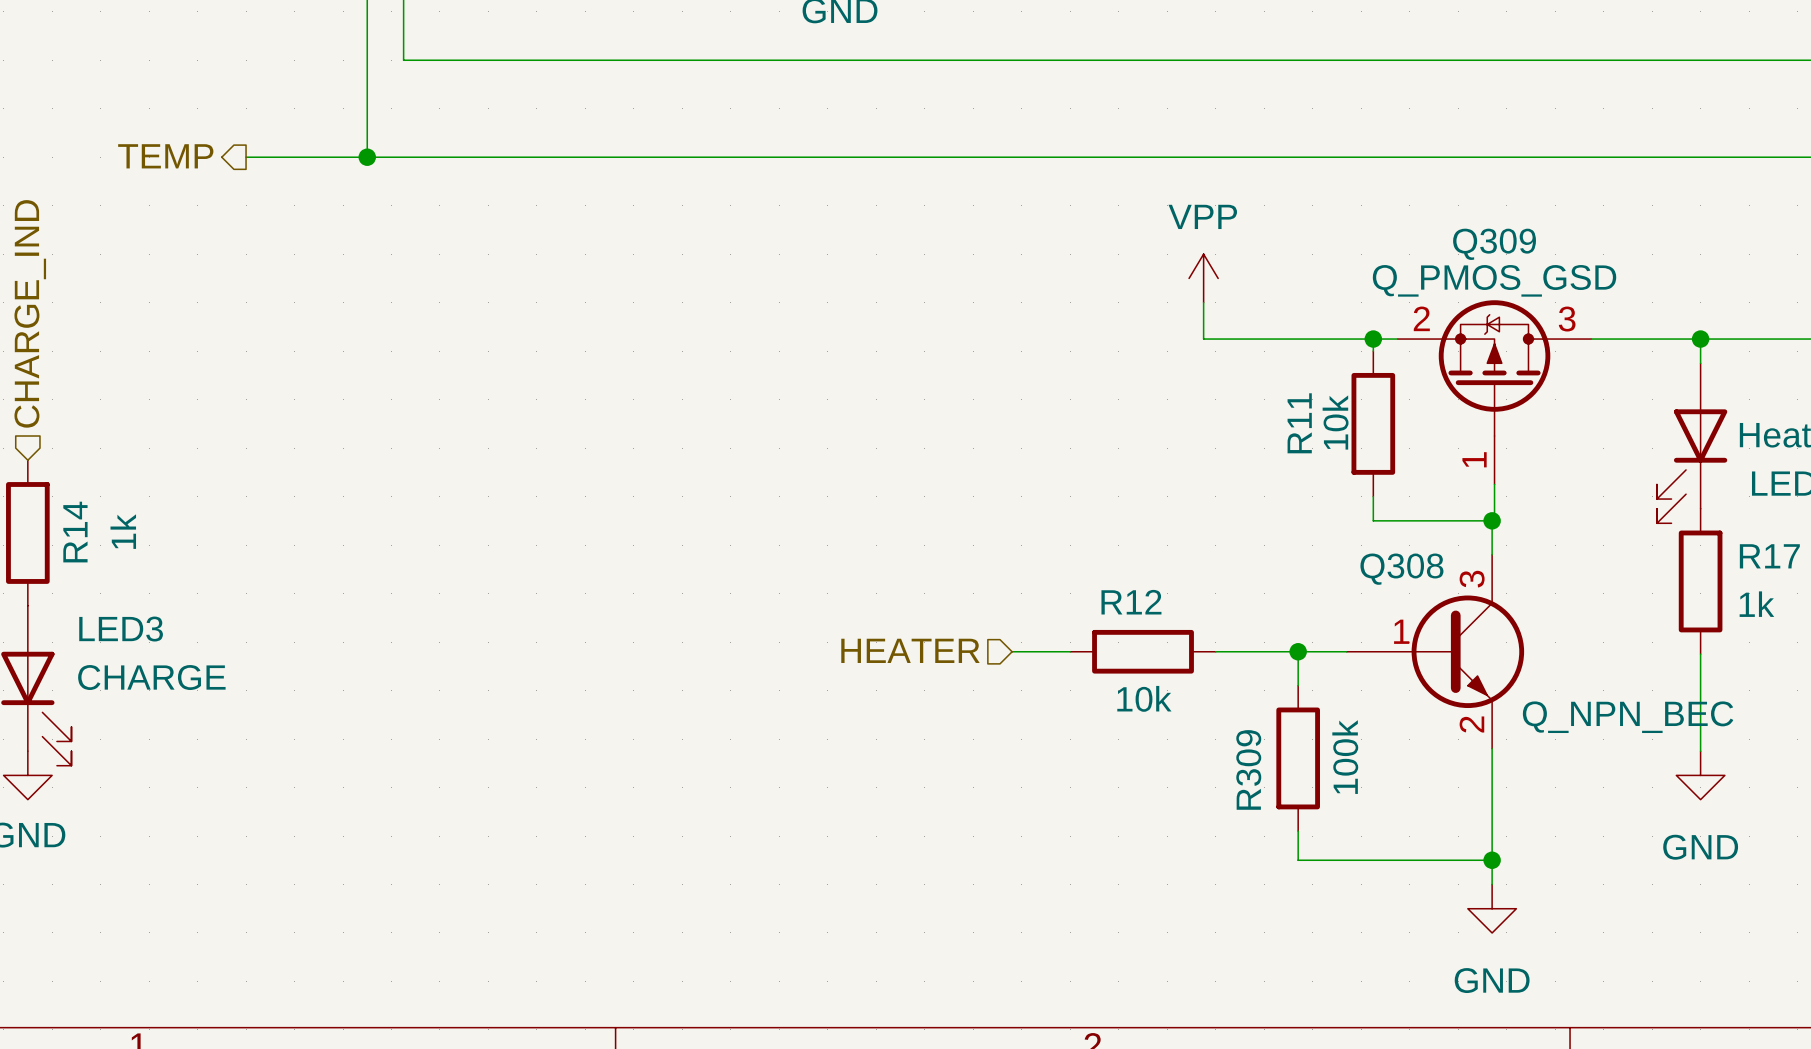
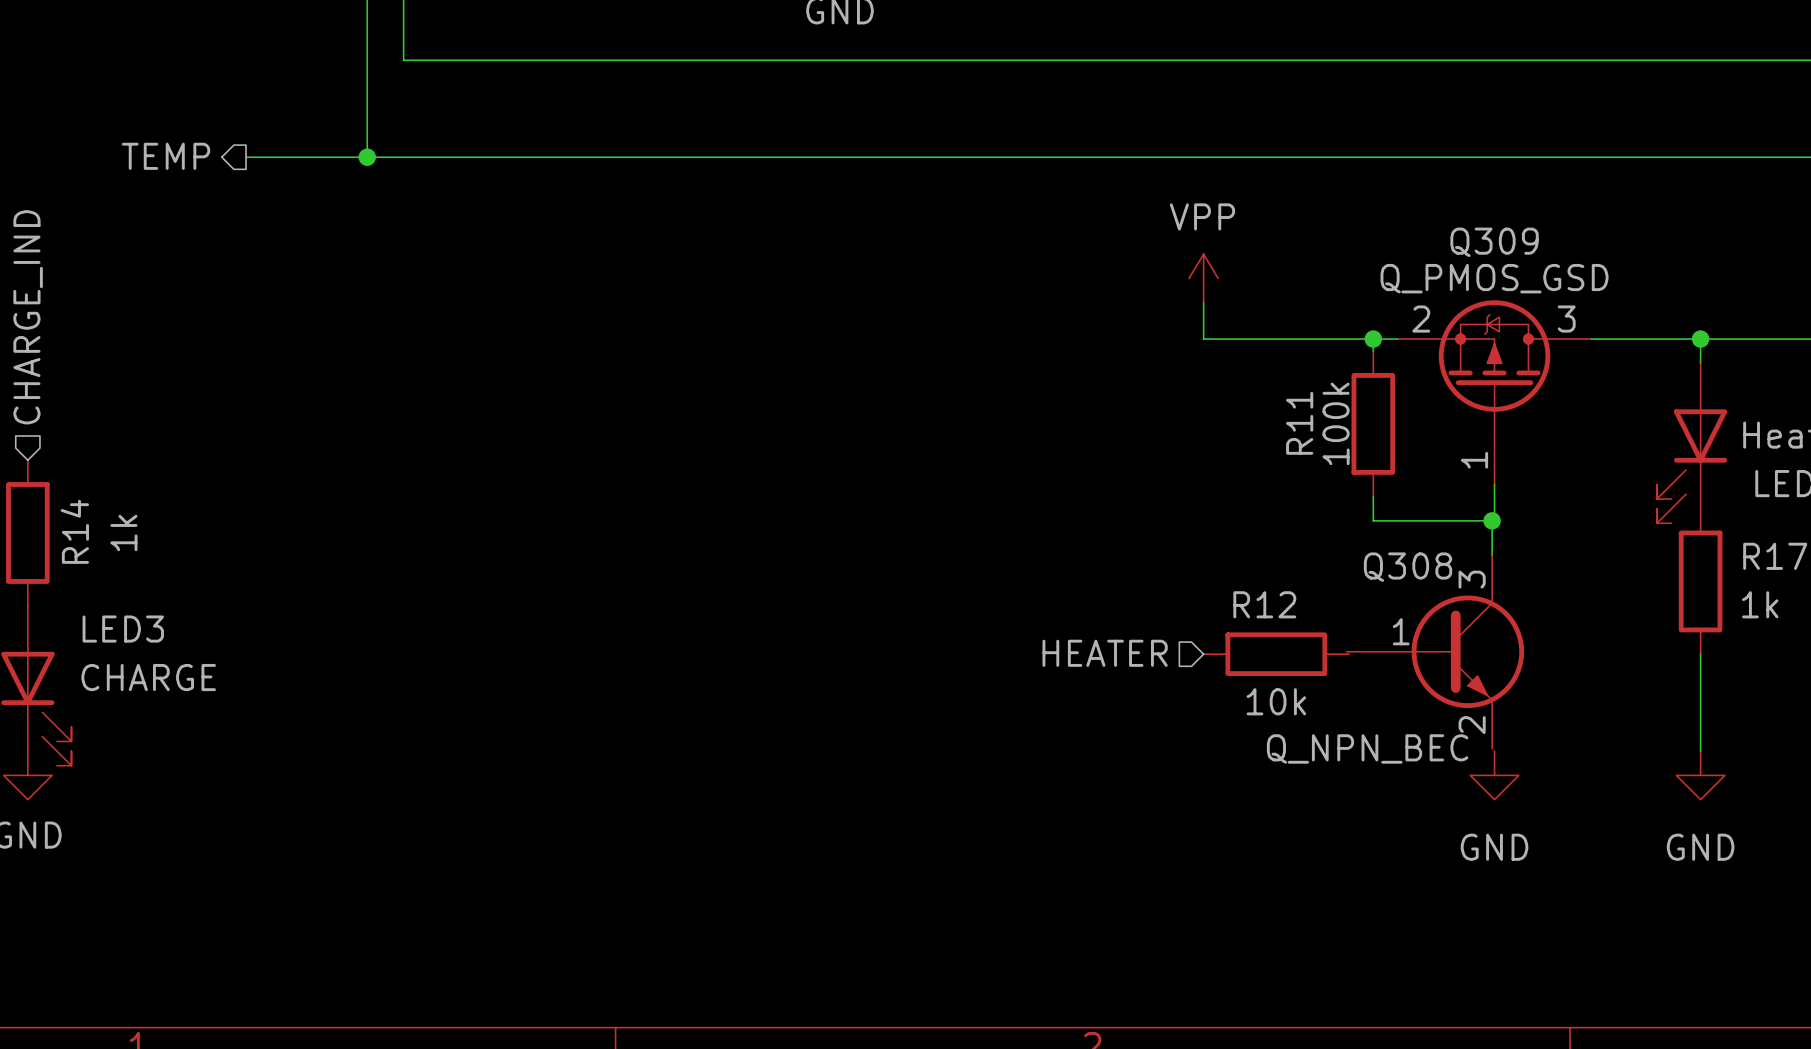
R11 value: 10k (1335, 422) -> 100k (1336, 423)
hierarchical label position: HEATER (910, 650) -> HEATER (1105, 653)
wire: (1012, 651) (1070, 651) -> none
R12 position: (1143, 651) -> (1276, 654)
wire: (1215, 651) (1346, 651) -> none
wire: (1298, 651) (1298, 685) -> none
junction: (1298, 651) -> none
Q308 value position: Q_NPN_BEC (1628, 717) -> Q_NPN_BEC (1367, 748)
wire: (1492, 748) (1492, 884) -> none
R309: 100k (1298, 758) -> none
wire: (1298, 831) (1298, 860) (1492, 860) -> none
junction: (1492, 860) -> none
power symbol position: GND (1492, 908) -> GND (1494, 775)

